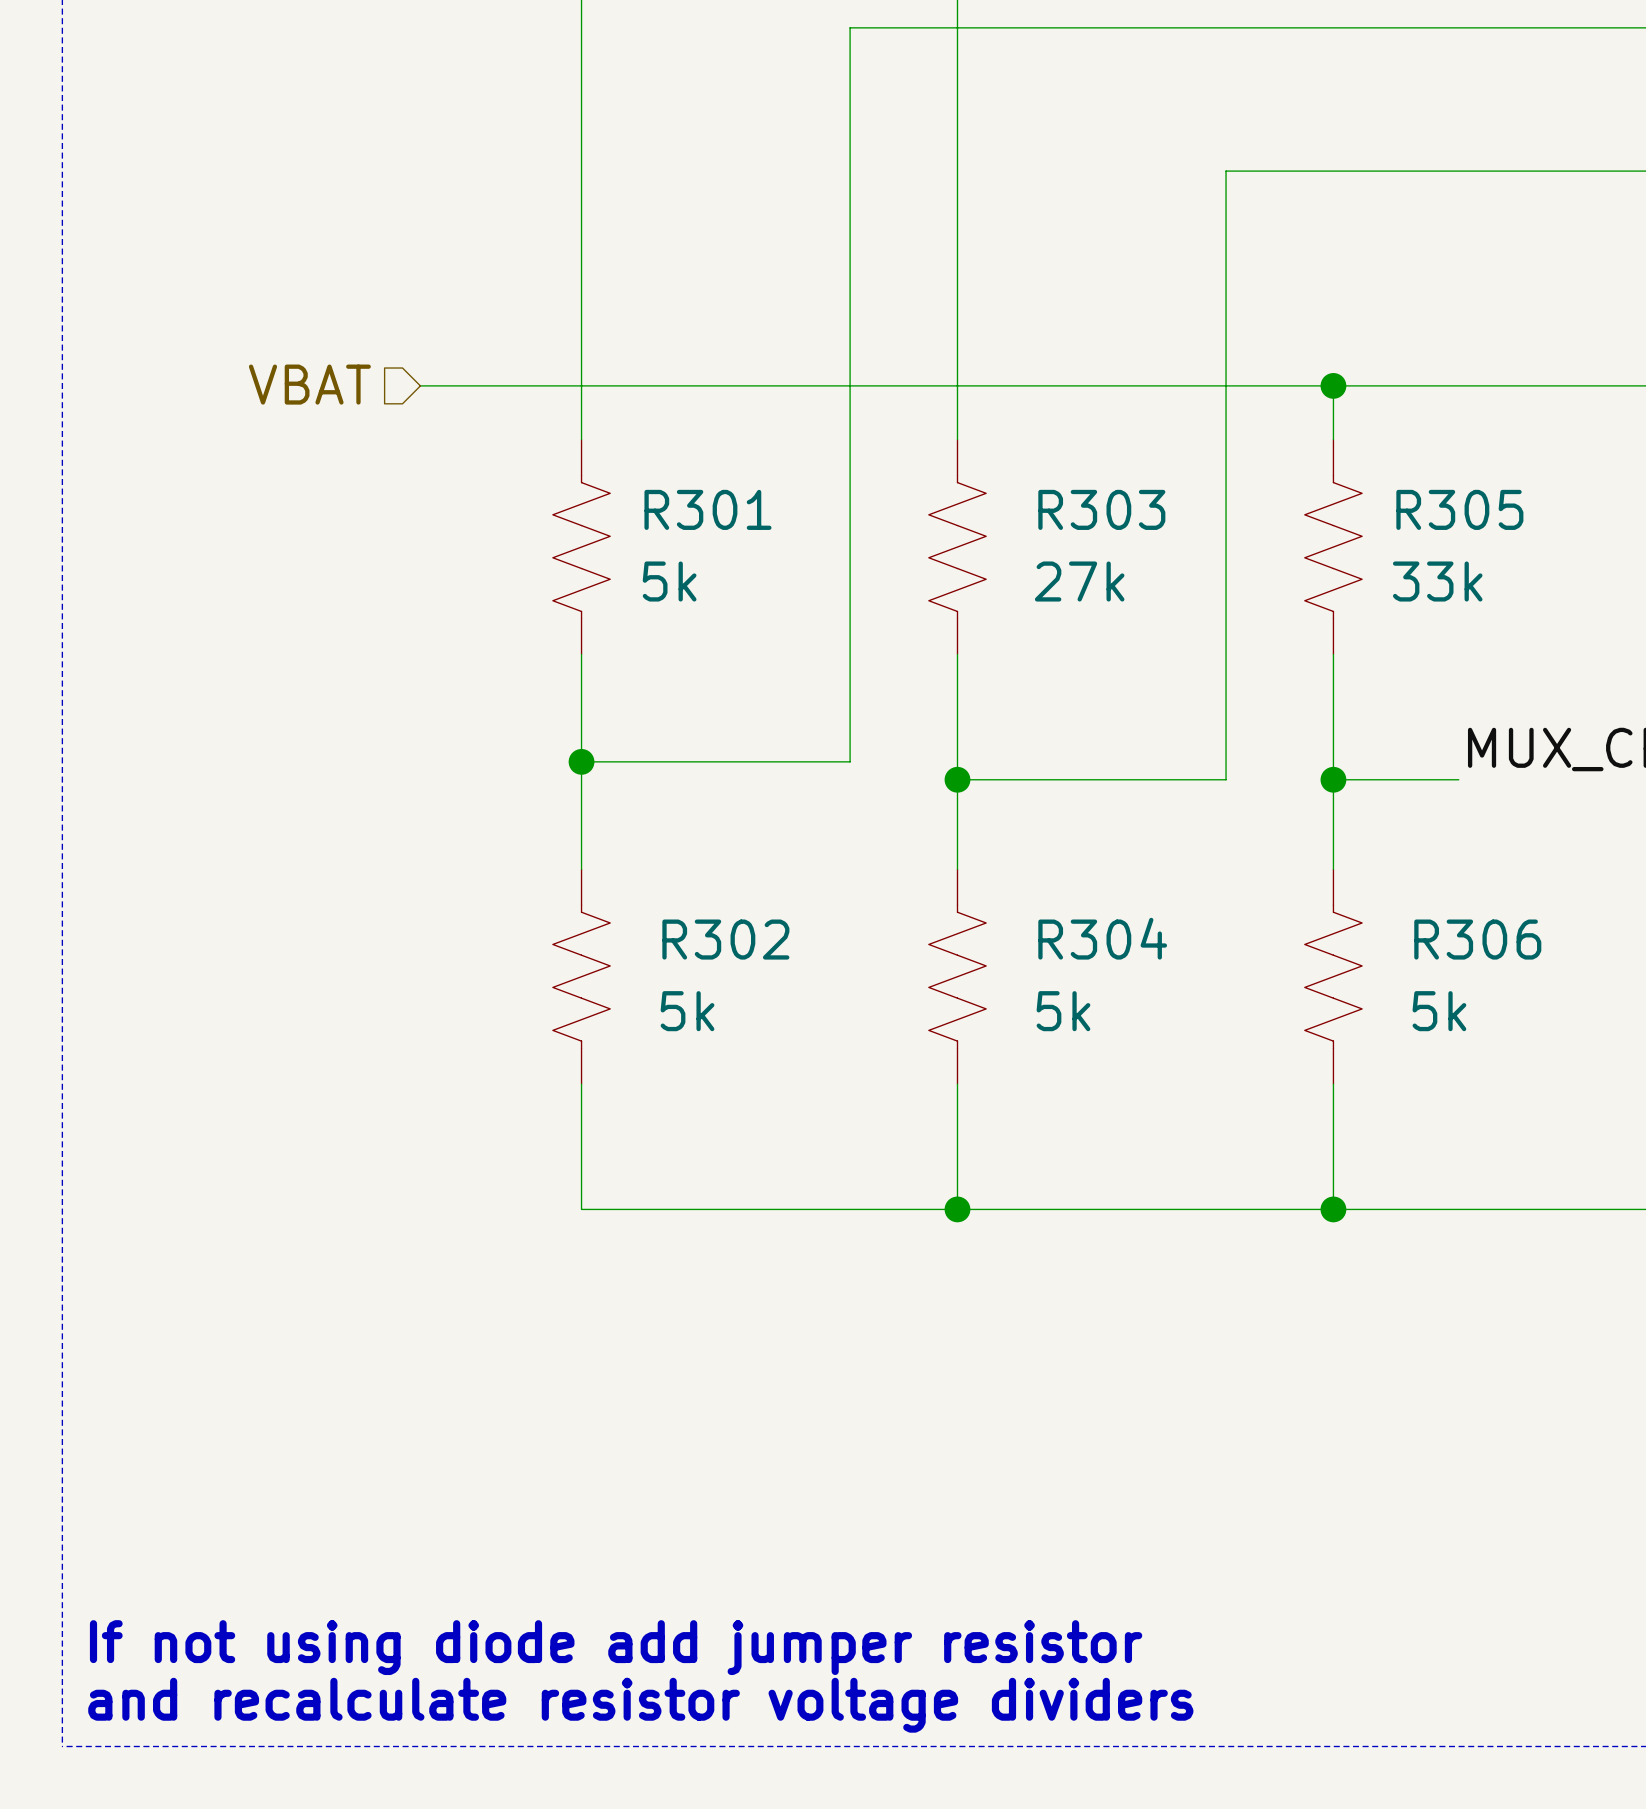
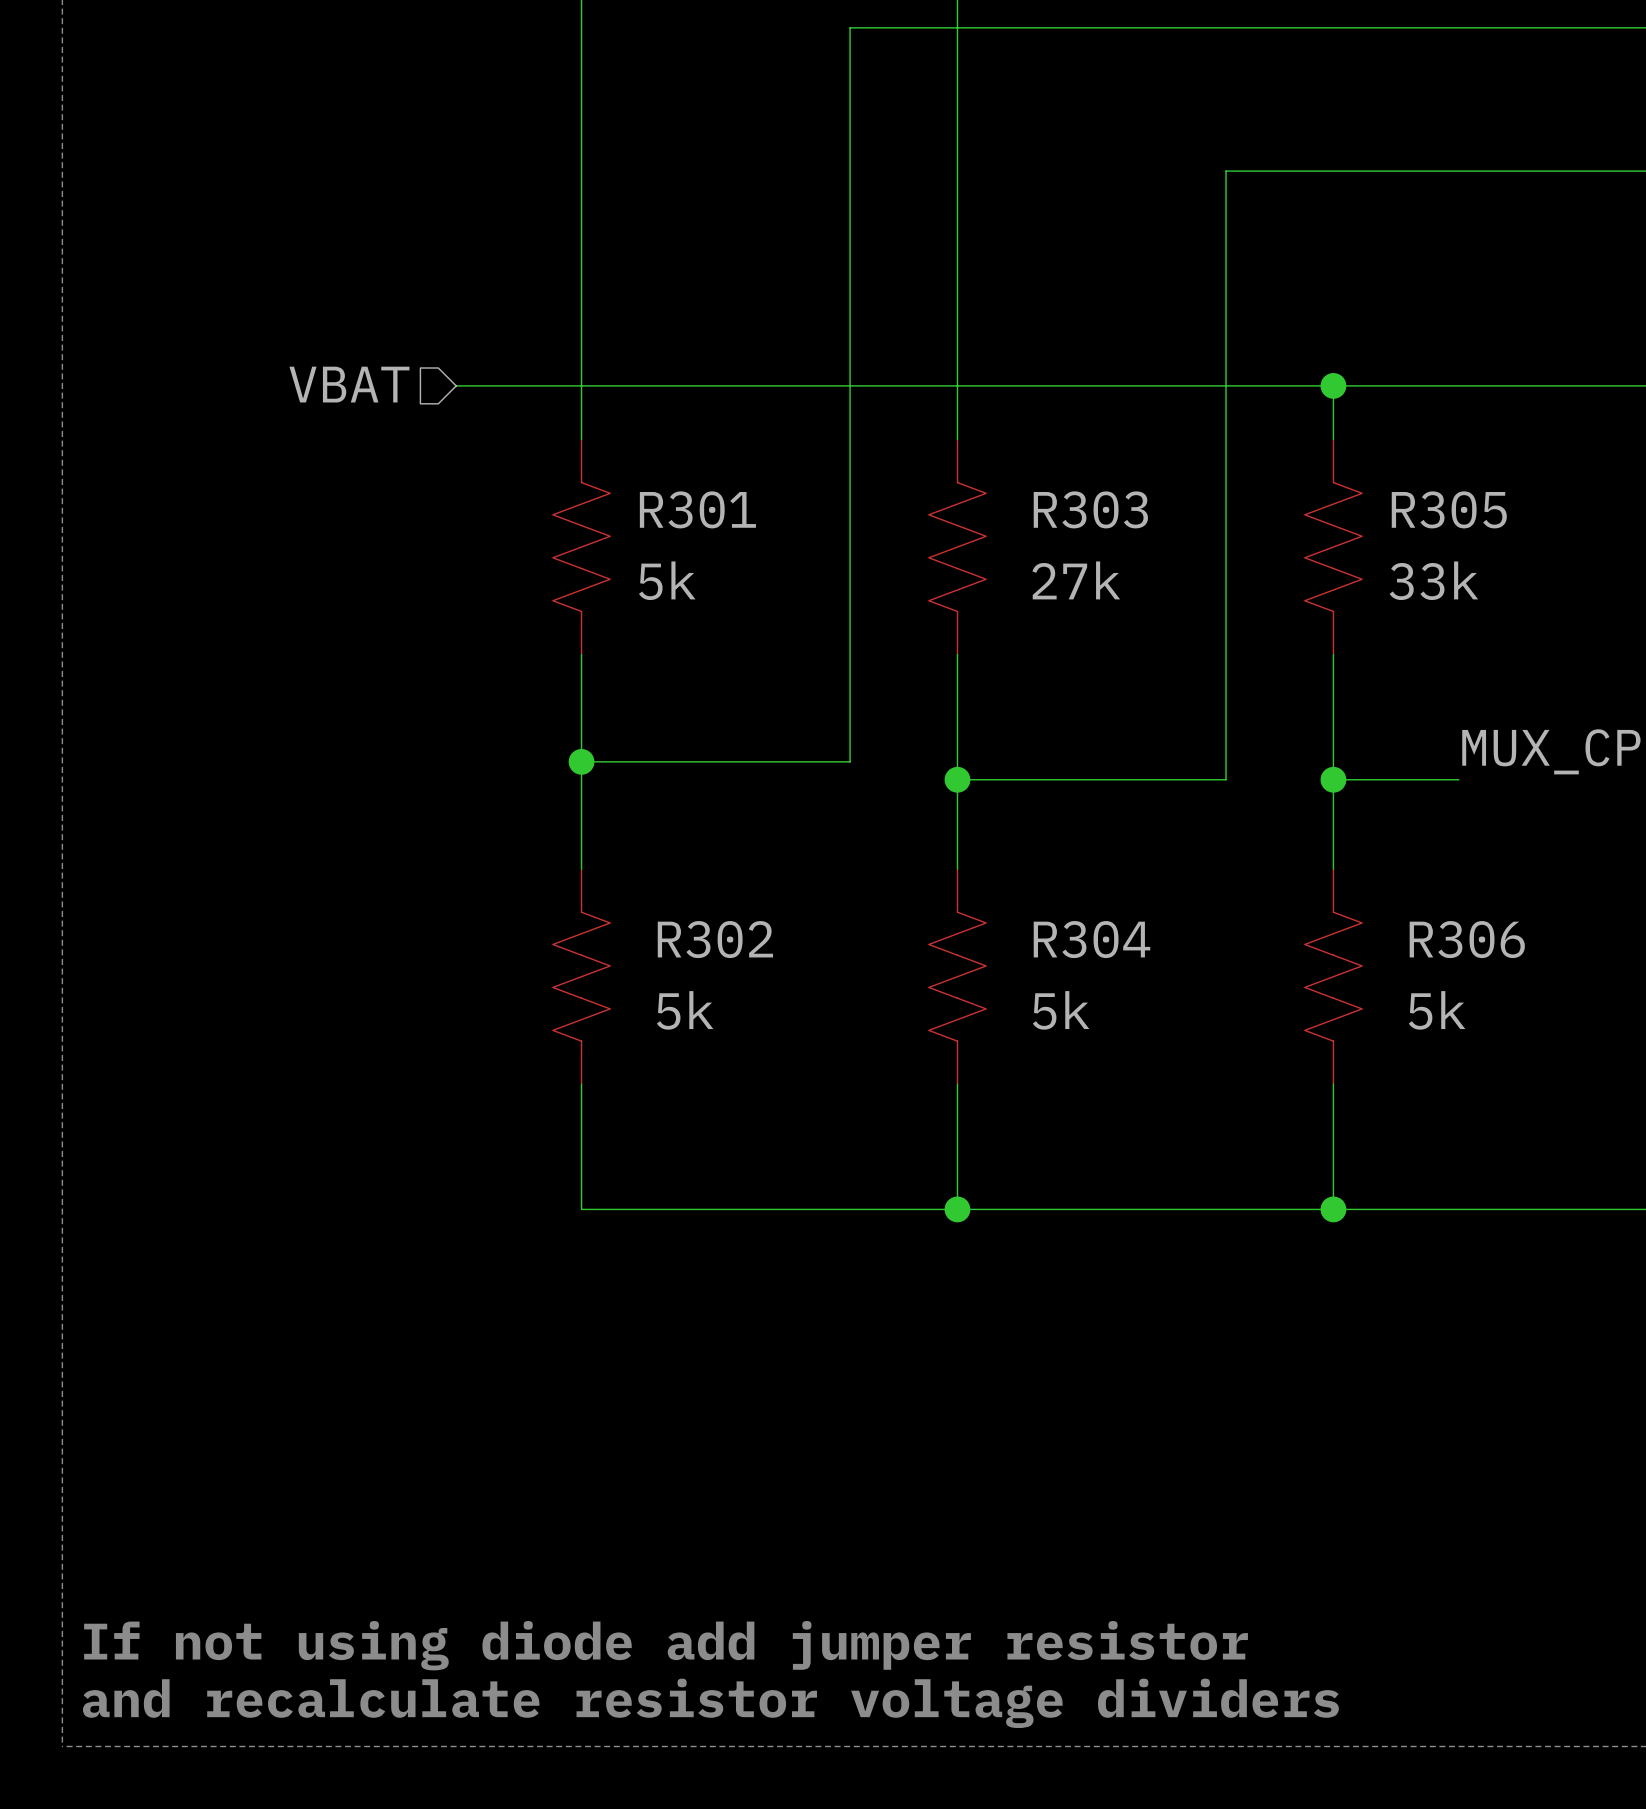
hierarchical label position: VBAT (309, 384) -> VBAT (349, 384)
wire: (420, 385) (456, 385) -> none

